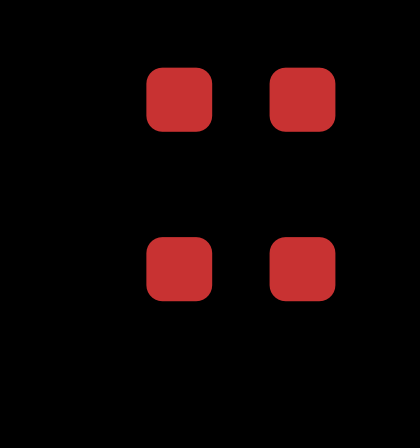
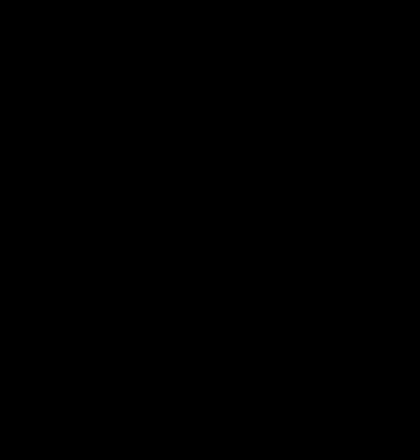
part: (240, 99) -> none
part: (240, 269) -> none

